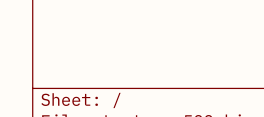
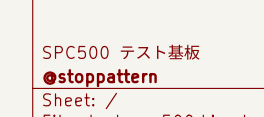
title block: none -> SPC500 テスト基板 (121, 52)
title block: none -> @stoppattern (100, 78)

